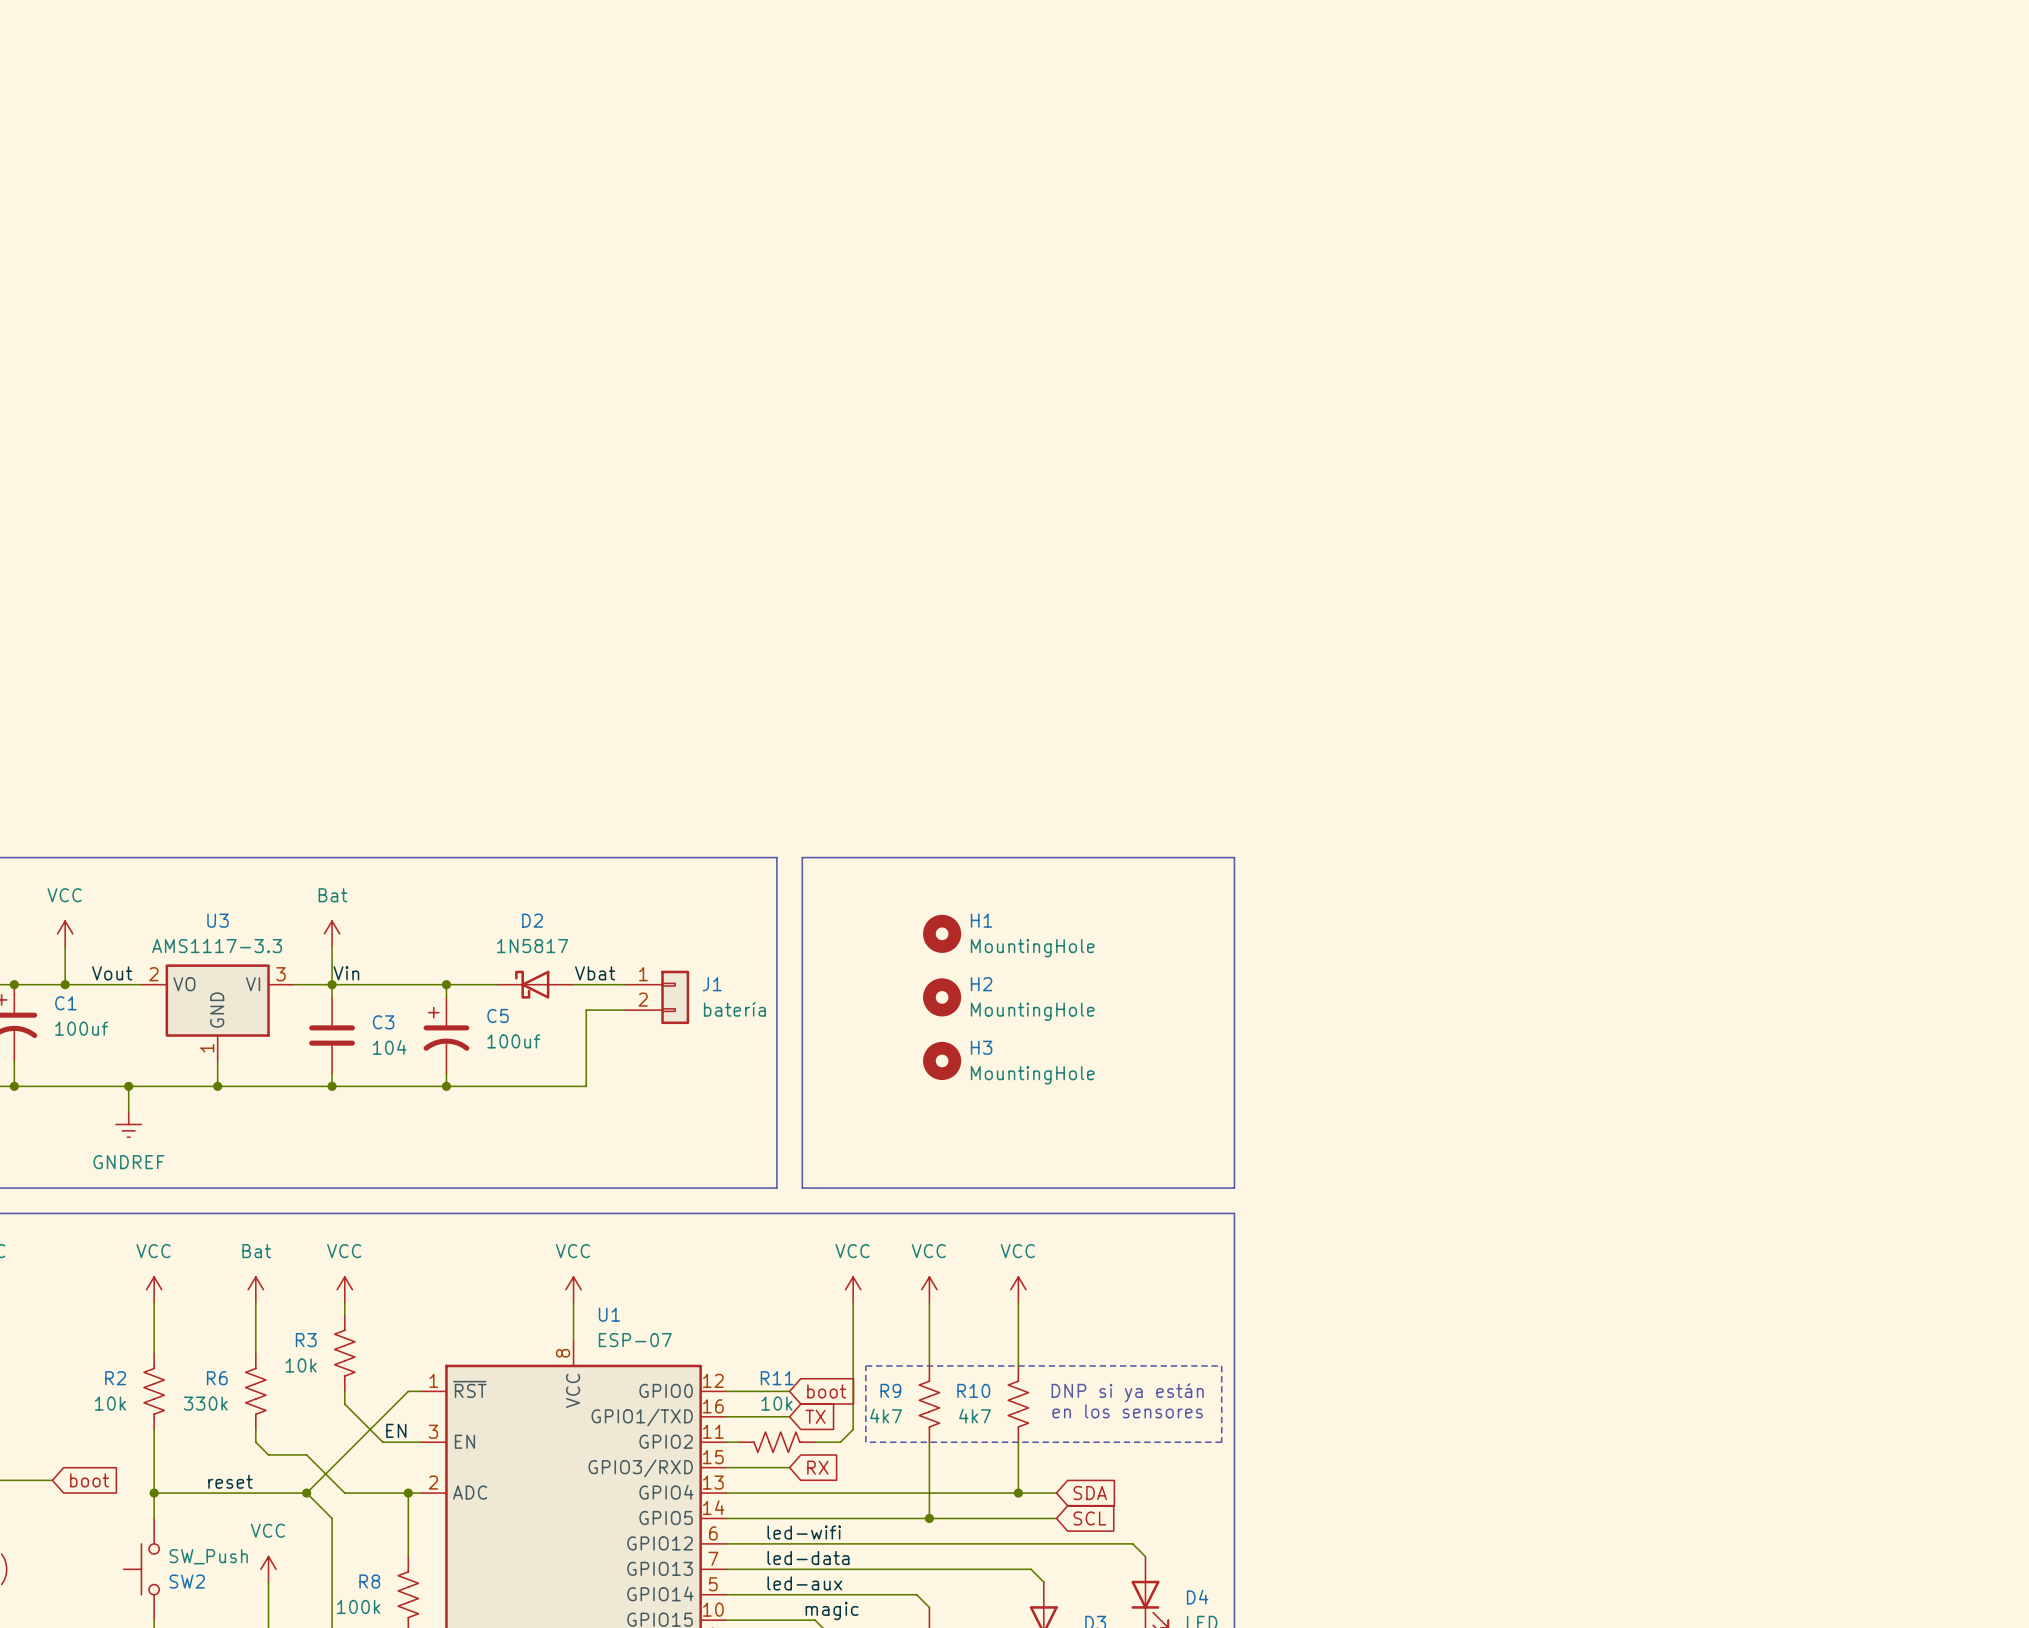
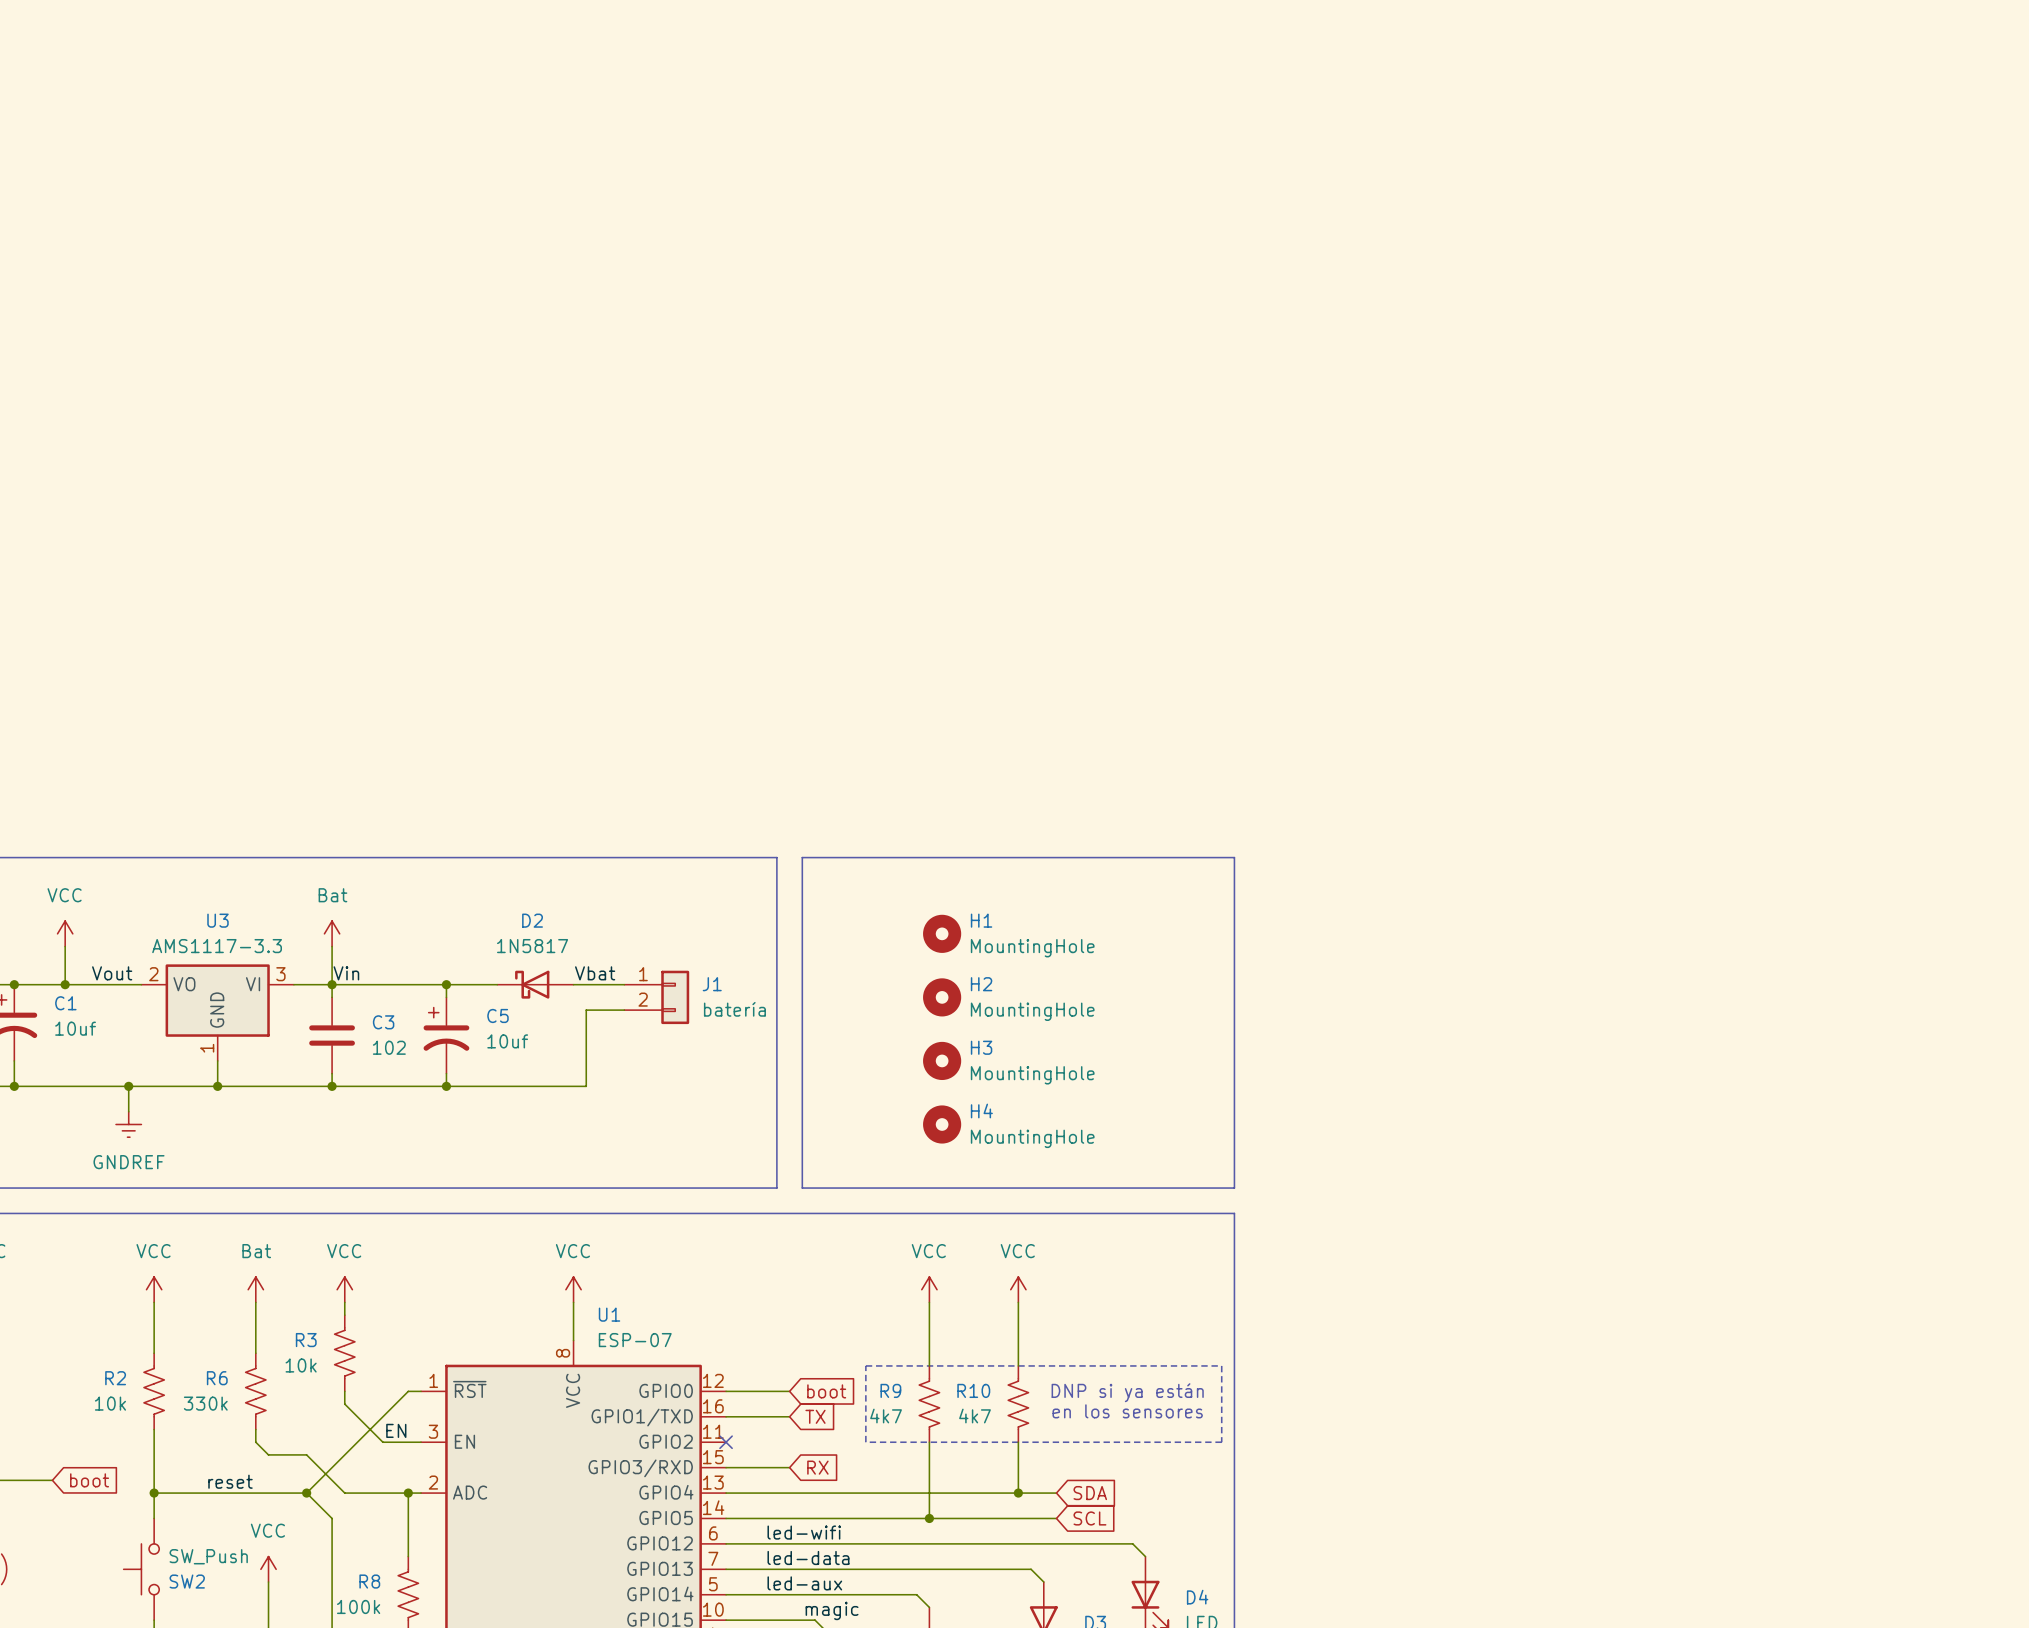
C1 value: 100uf (81, 1028) -> 10uf (75, 1028)
C5 value: 100uf (513, 1041) -> 10uf (507, 1041)
C3 value: 104 (389, 1047) -> 102 (389, 1047)
H4: none -> MountingHole (942, 1124)
power symbol: VCC (853, 1289) -> none
wire: (853, 1302) (853, 1429) (840, 1442) (815, 1442) -> none
wire: (726, 1442) (738, 1442) -> none
no-connect mark: none -> (726, 1442)
R11: 10k (776, 1442) -> none

